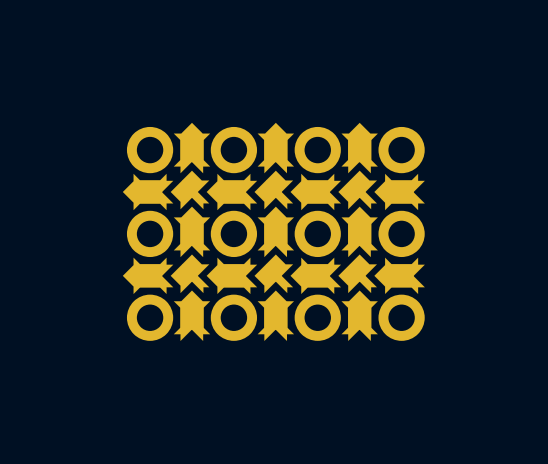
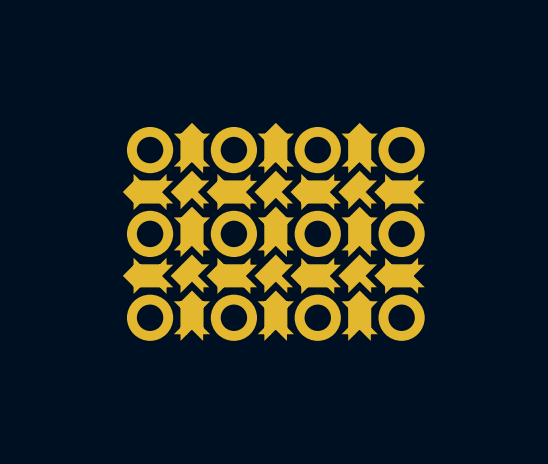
part footprint: [173, 122, 211, 174] -> [173, 122, 211, 174]
part footprint: [257, 122, 295, 174] -> [257, 122, 294, 174]
part footprint: [341, 122, 378, 174] -> [341, 122, 378, 174]
part footprint: [122, 173, 174, 211] -> [122, 173, 174, 211]
part footprint: [206, 173, 258, 211] -> [206, 173, 258, 211]
part footprint: [290, 173, 341, 211] -> [290, 173, 341, 211]
part footprint: [374, 173, 425, 211] -> [374, 173, 425, 211]
part footprint: [173, 206, 211, 258] -> [173, 206, 211, 258]
part footprint: [257, 206, 295, 258] -> [257, 206, 294, 258]
part footprint: [341, 206, 378, 258] -> [341, 206, 378, 258]
part footprint: [122, 257, 174, 295] -> [122, 257, 174, 294]
part footprint: [206, 257, 258, 295] -> [206, 257, 258, 294]
part footprint: [290, 257, 341, 295] -> [290, 257, 341, 294]
part footprint: [374, 257, 425, 295] -> [374, 257, 425, 294]
part footprint: [173, 290, 211, 341] -> [173, 290, 211, 341]
part footprint: [257, 290, 295, 341] -> [257, 290, 294, 341]
part footprint: [341, 290, 378, 341] -> [341, 290, 378, 341]

